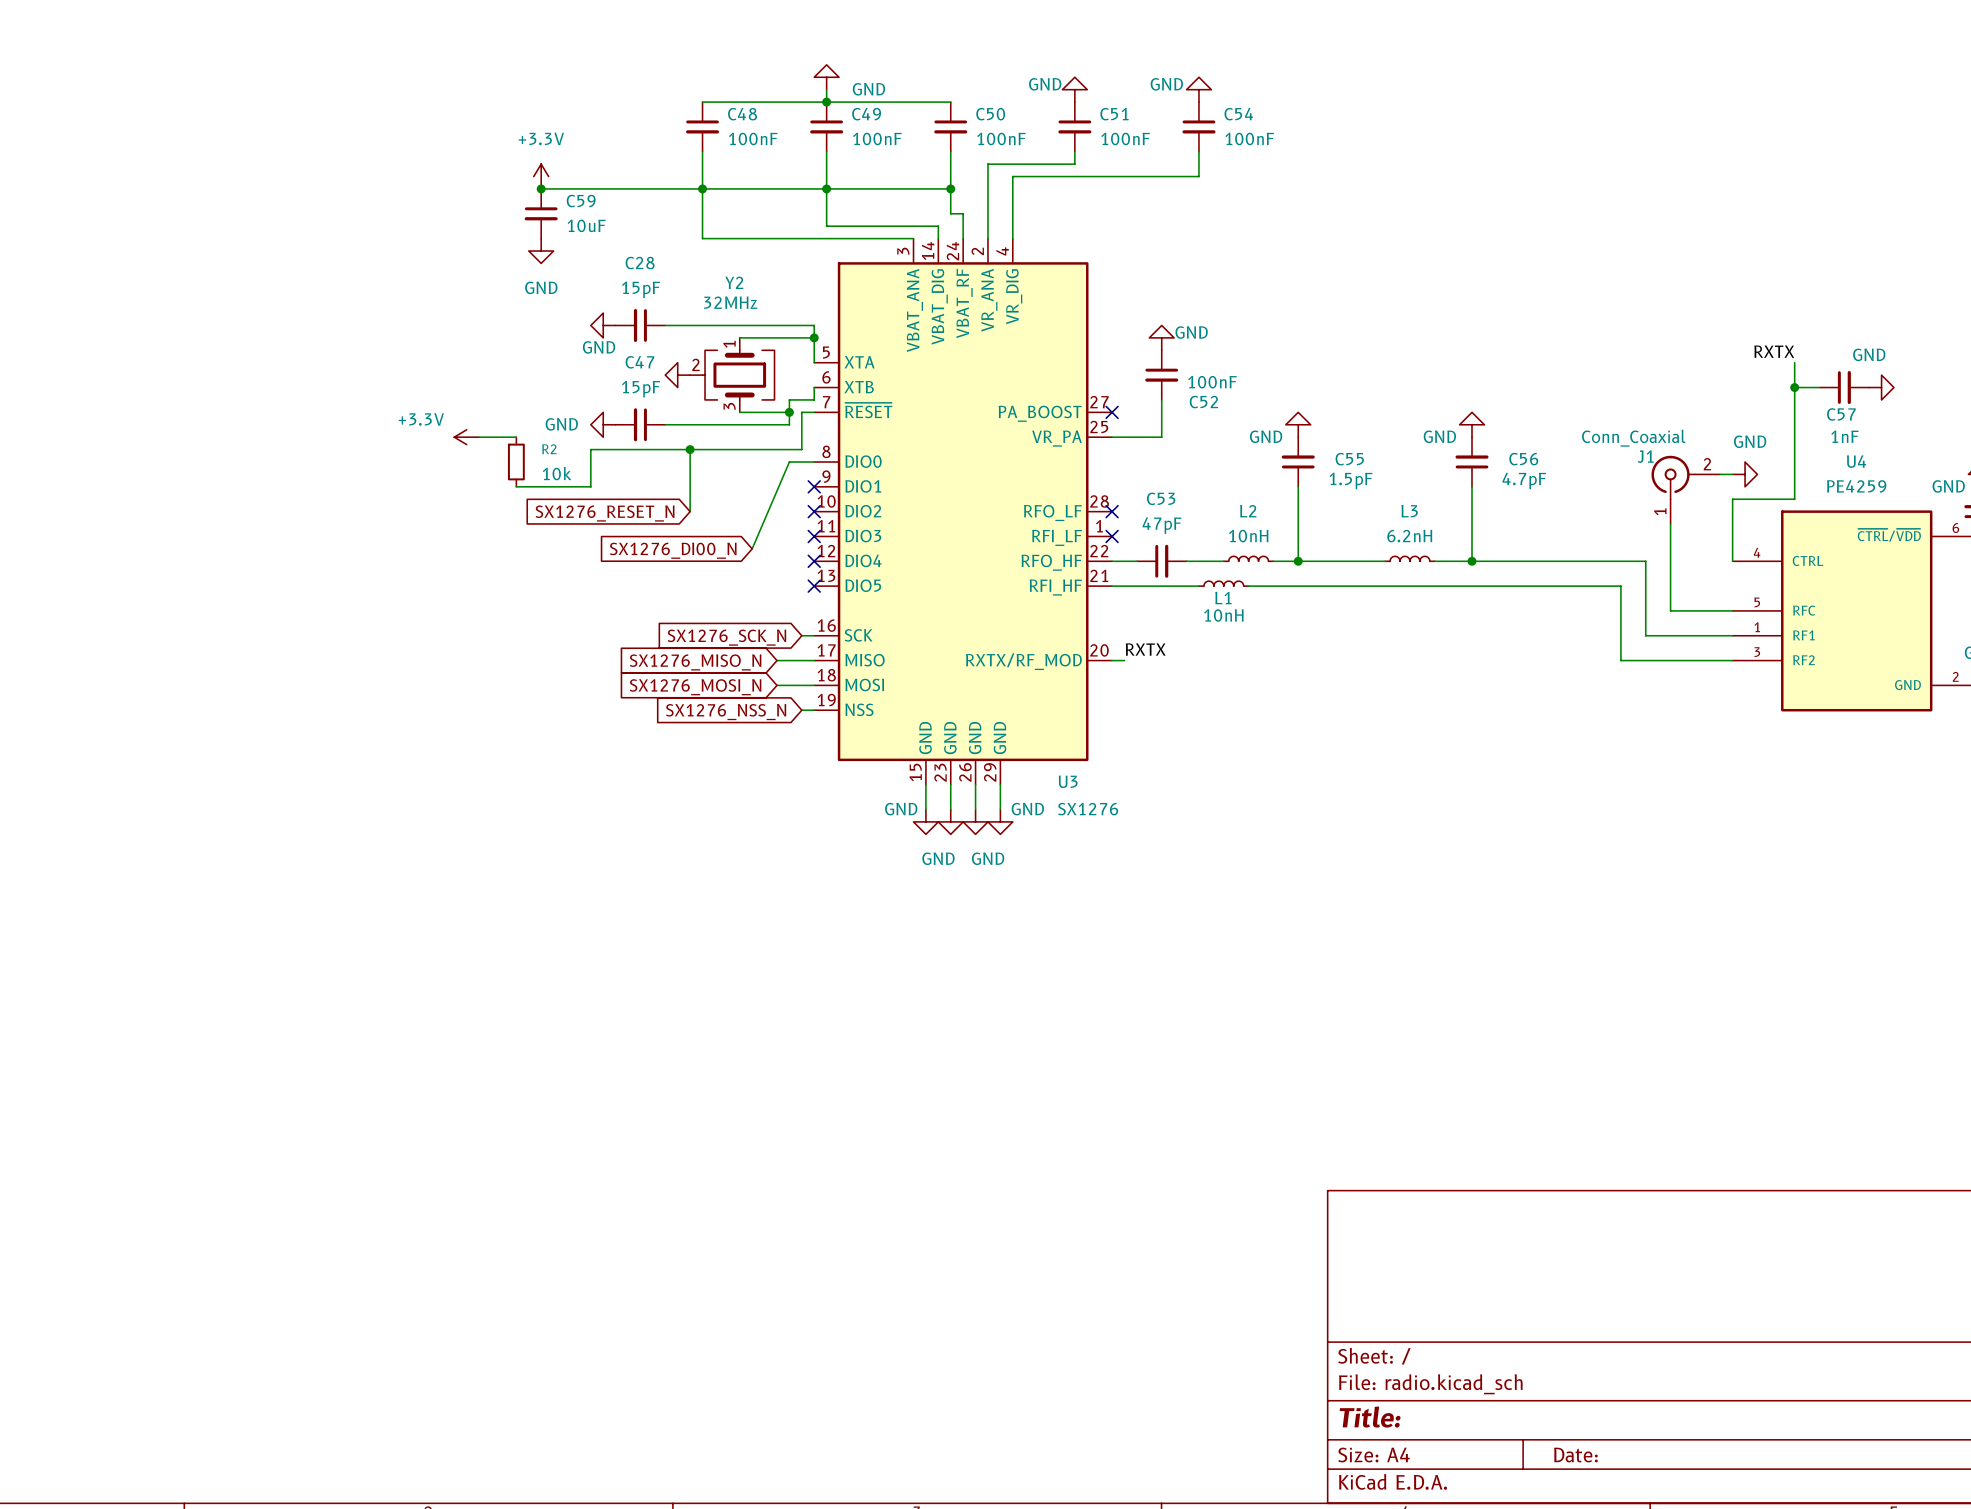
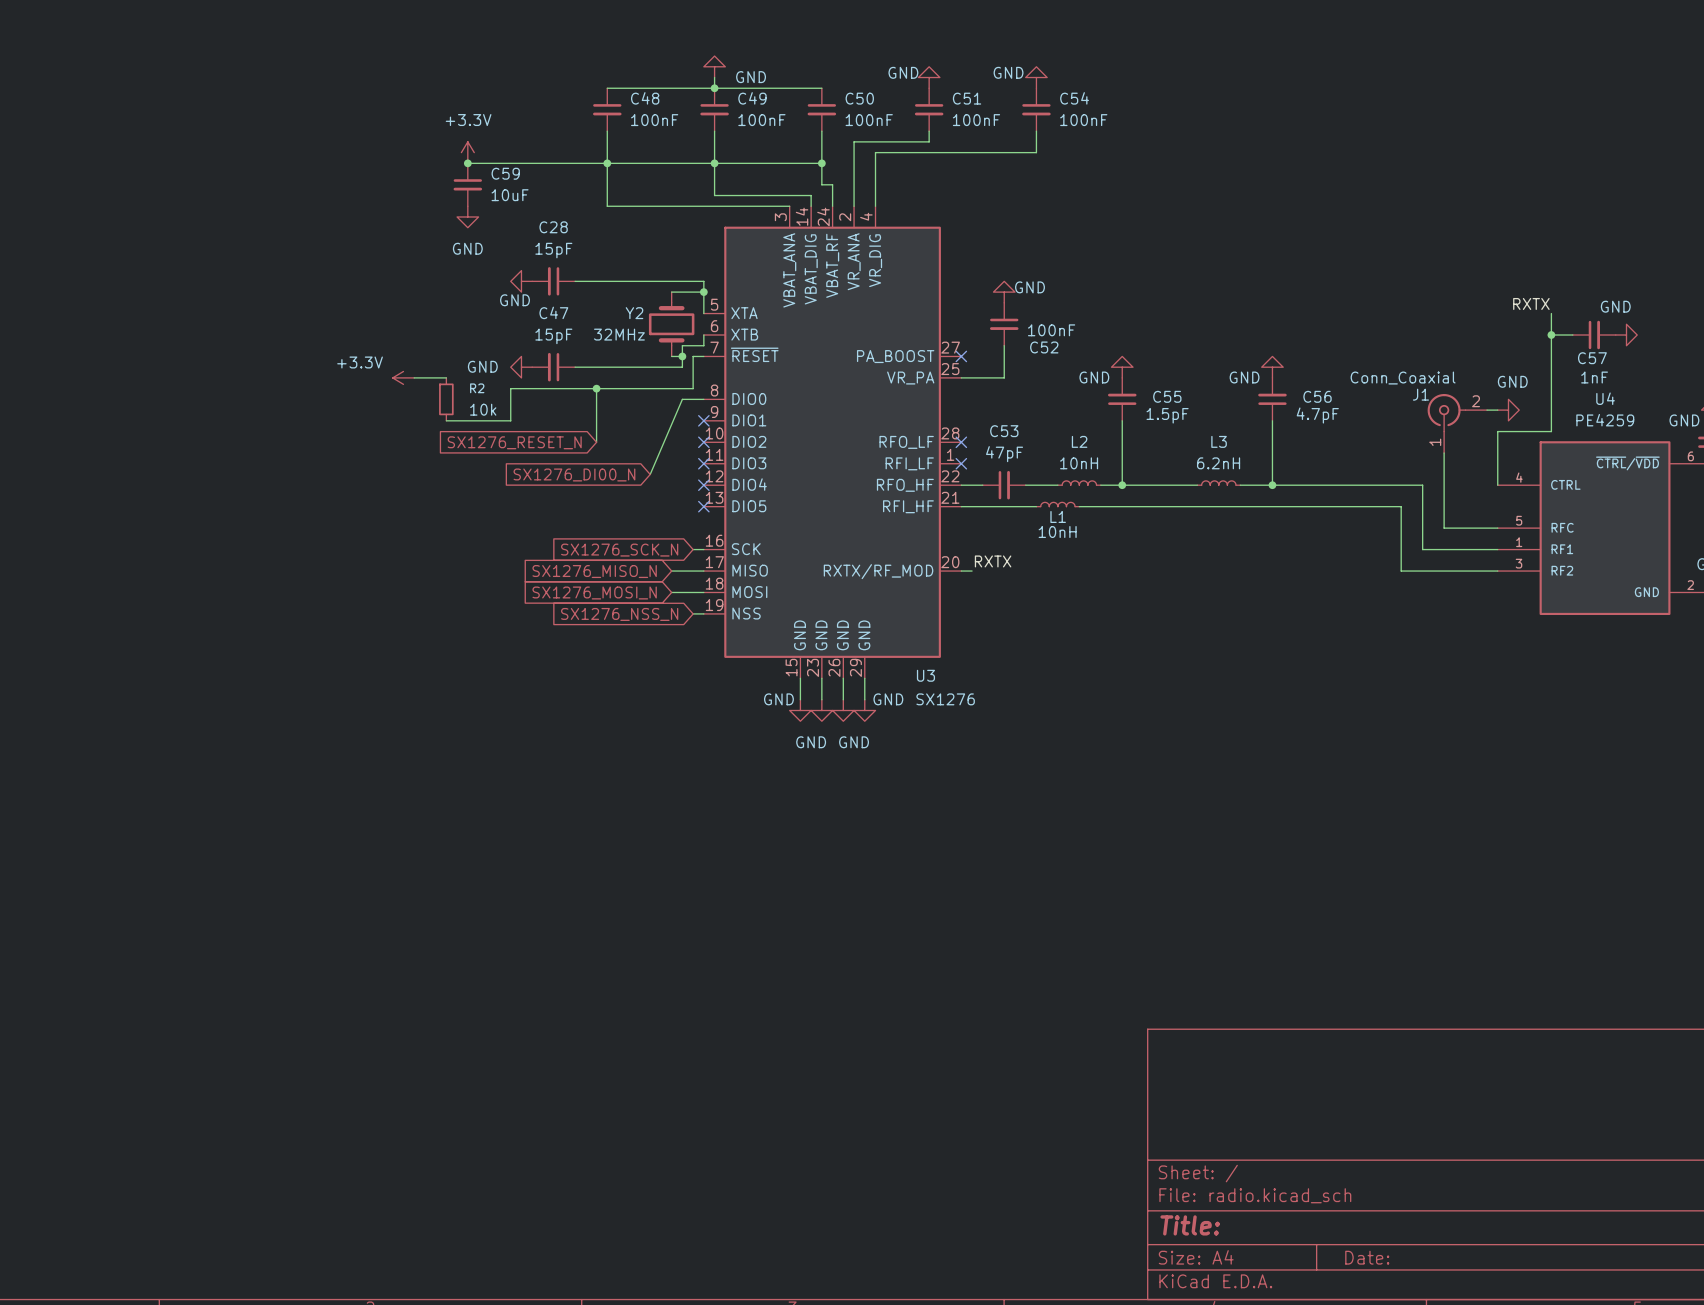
Y2 name position: Y2 (734, 282) -> Y2 (634, 313)
Y2 value position: 32MHz (730, 302) -> 32MHz (619, 334)
Y2 symbol: [690, 337, 775, 413] -> [648, 292, 695, 357]
wire: (739, 337) (776, 337) -> none
power symbol: (677, 375) -> none
wire: (739, 412) (776, 412) -> none

